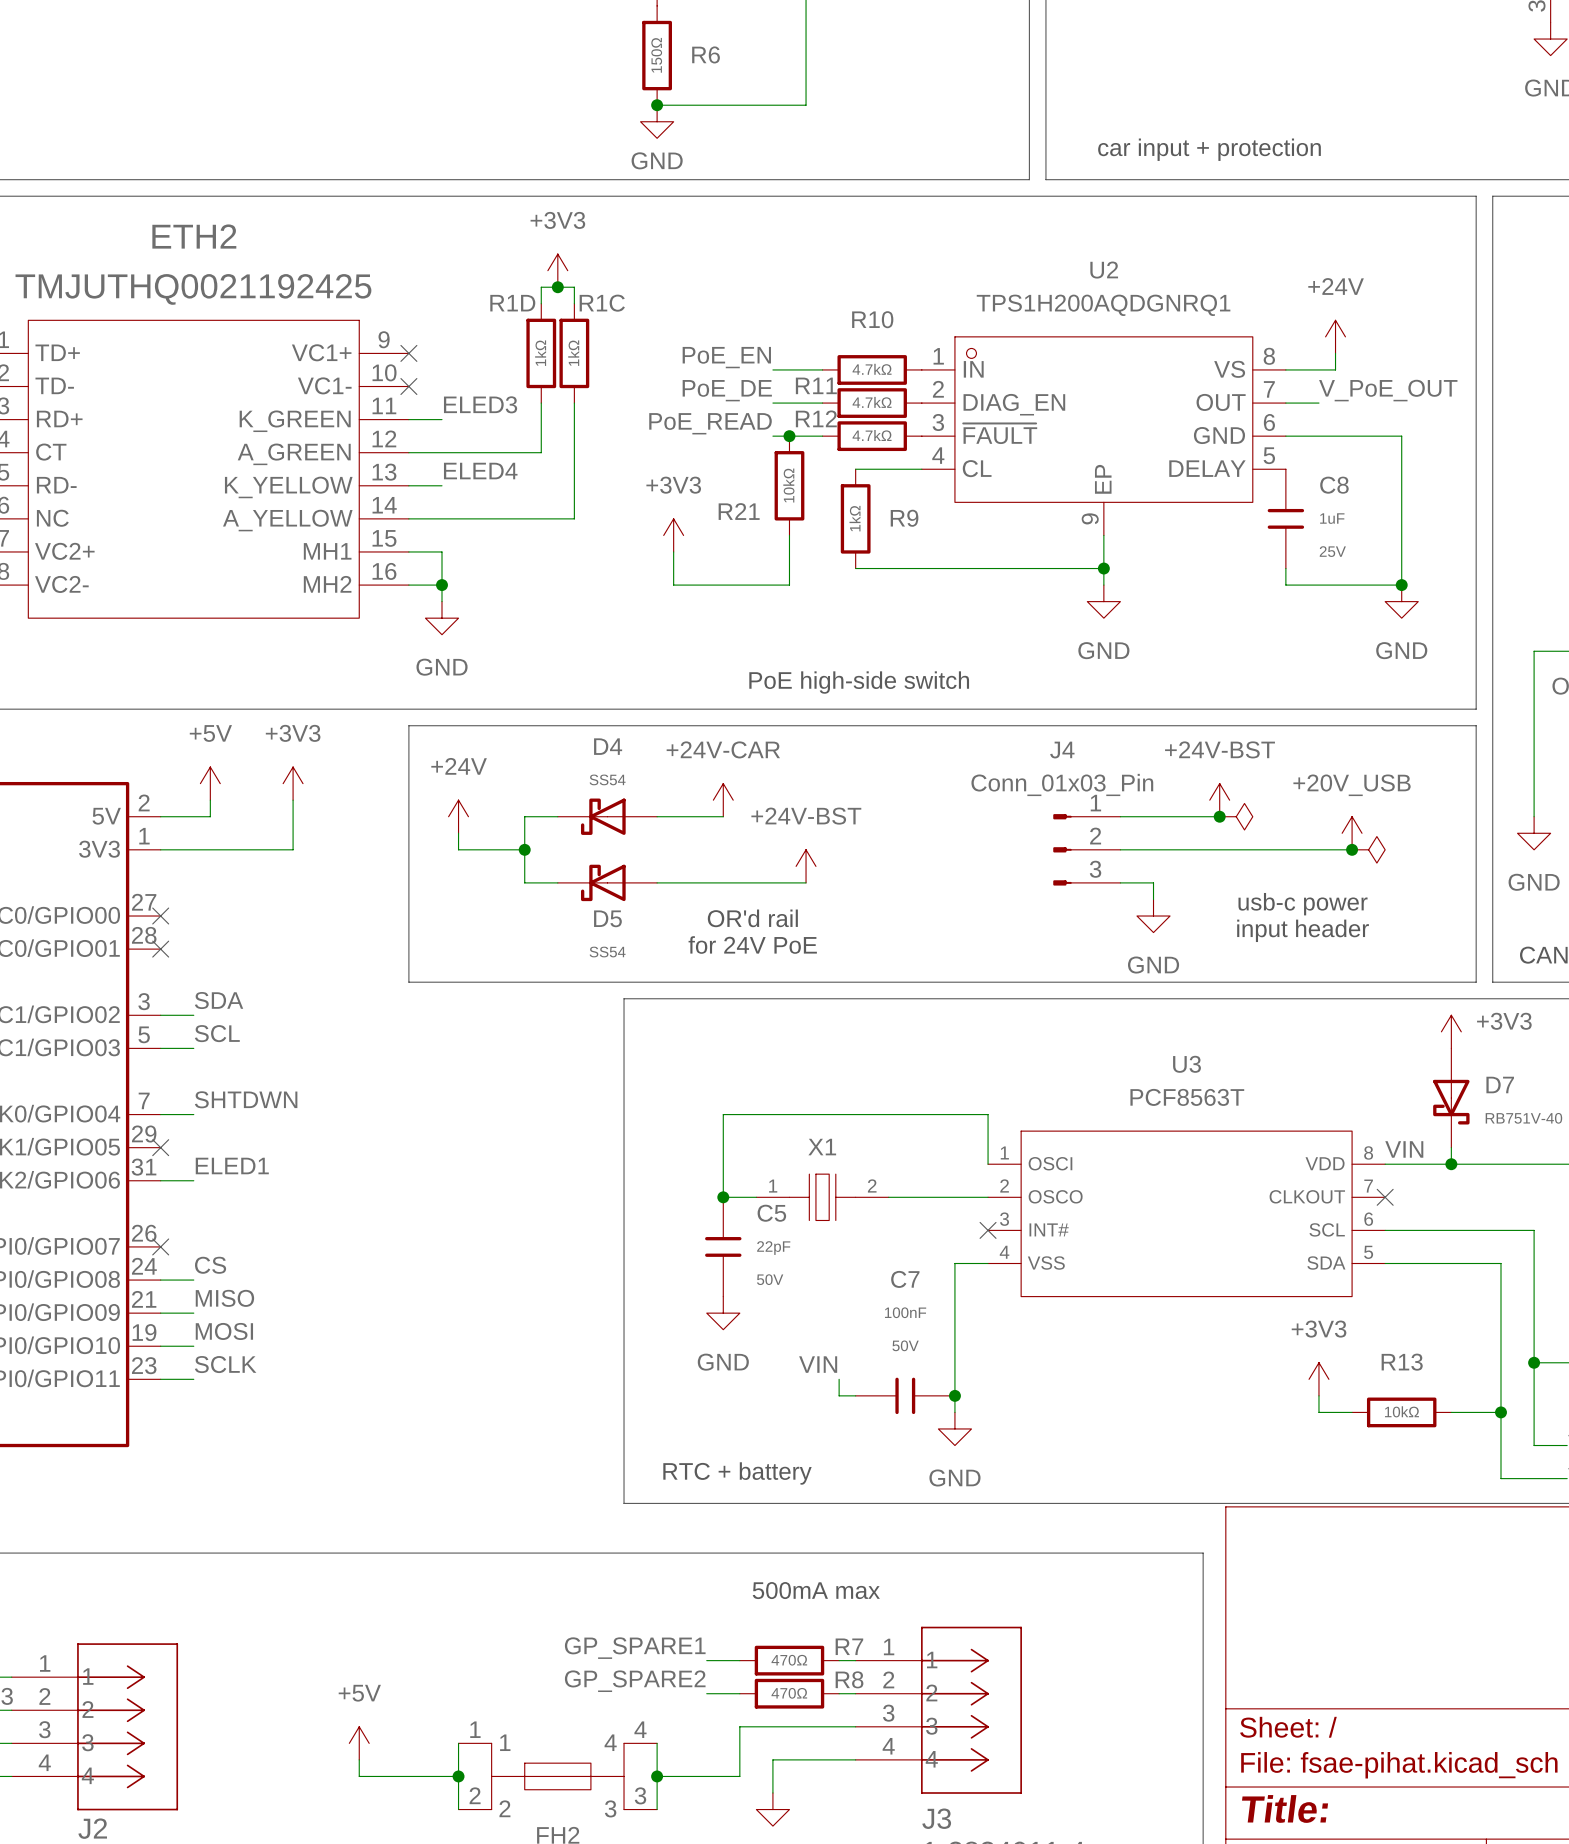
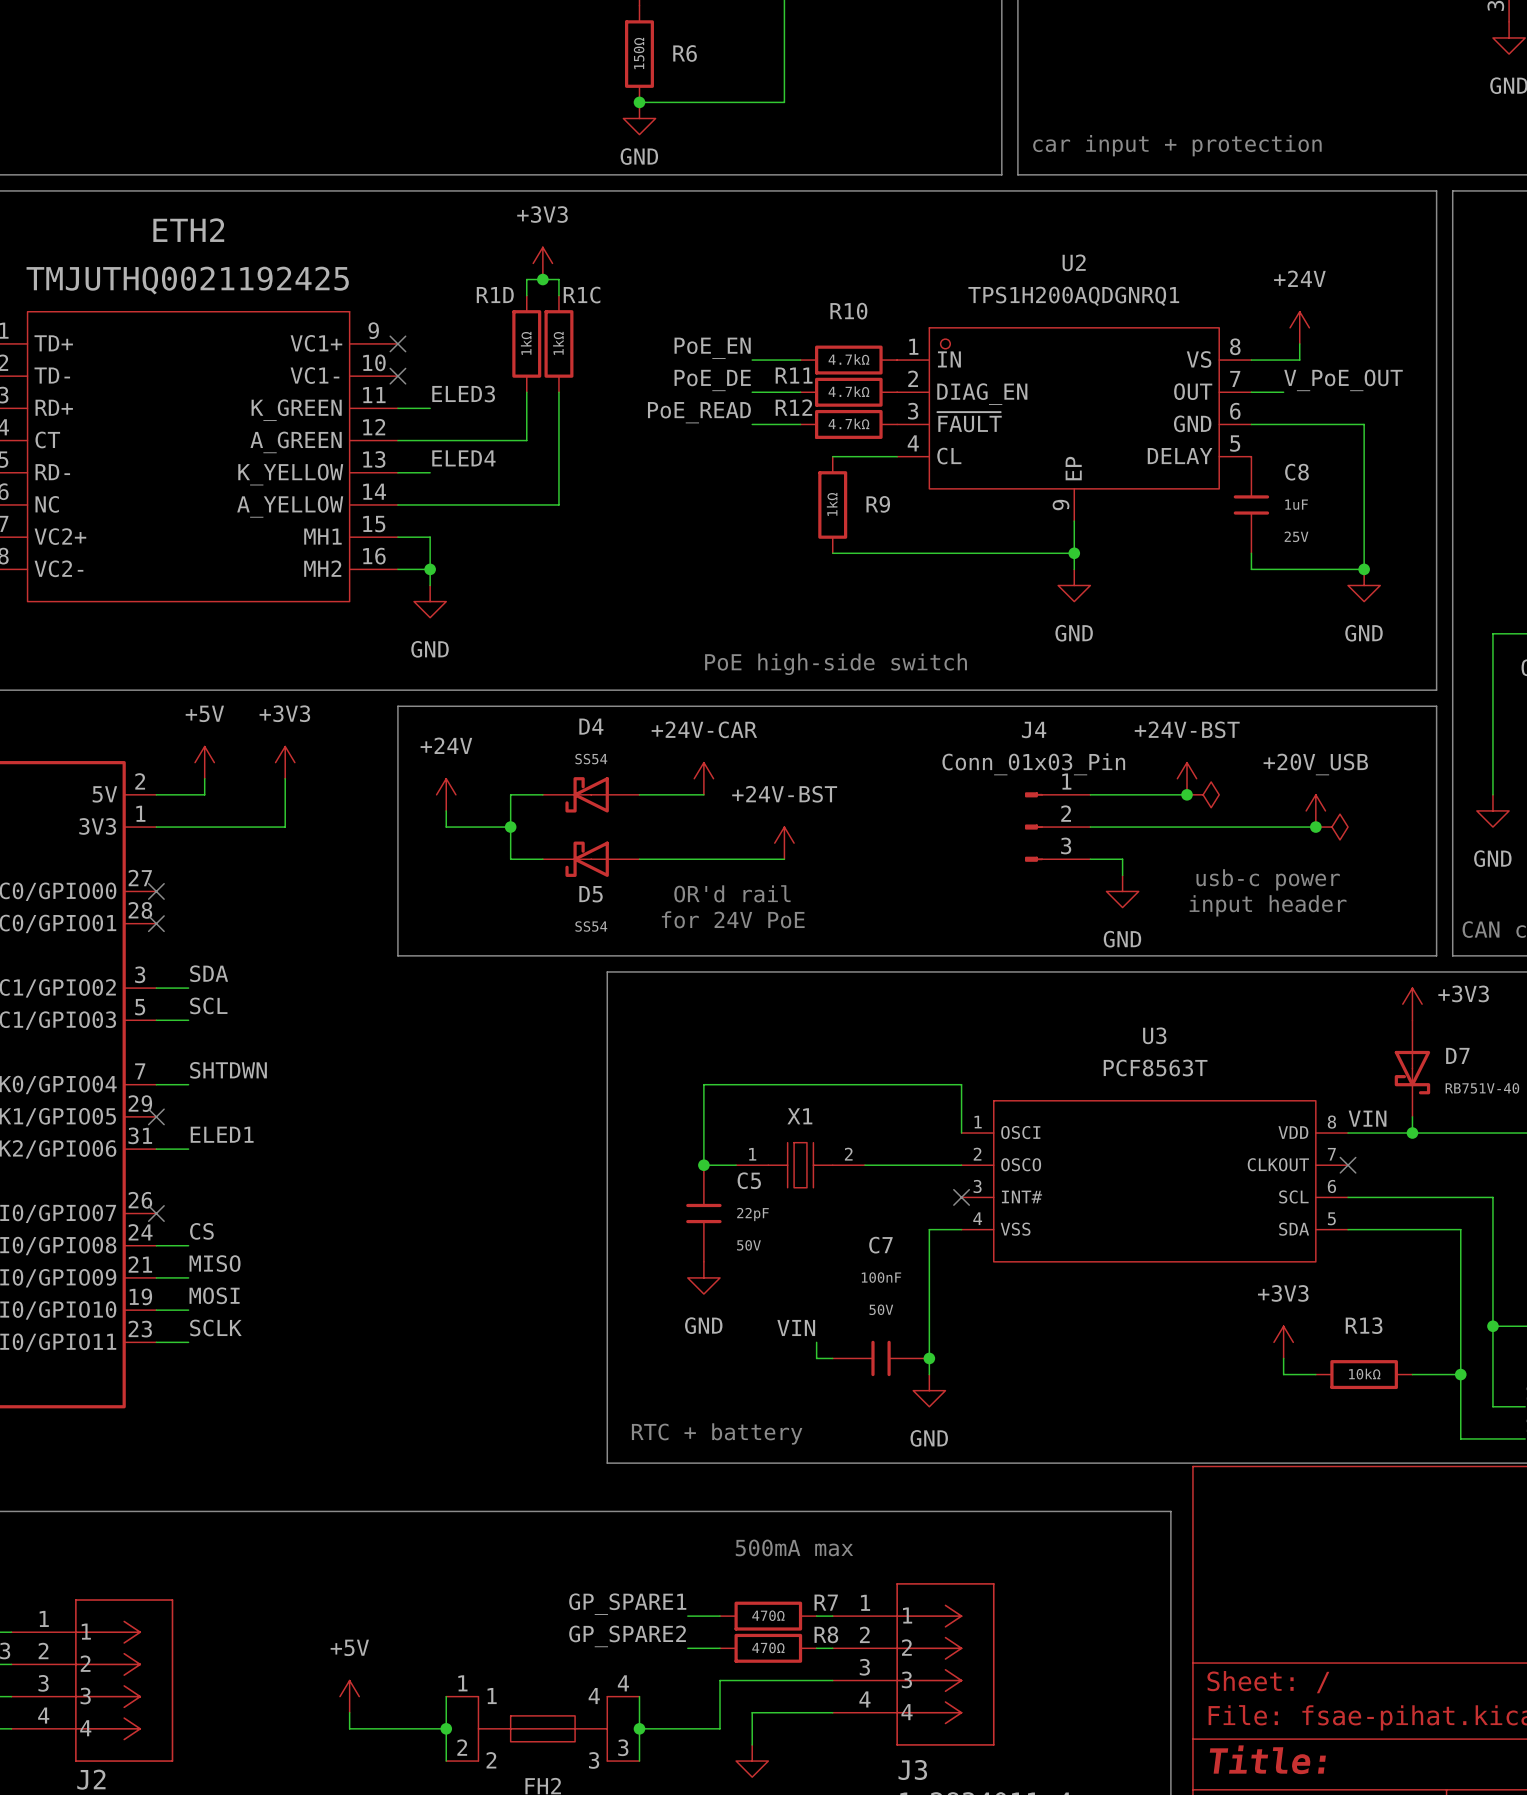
junction: (789, 436) -> none
R21: 10kΩ (789, 485) -> none
power symbol: +3V3 (673, 535) -> none
wire: (789, 535) (789, 585) (673, 585) (673, 551) -> none

